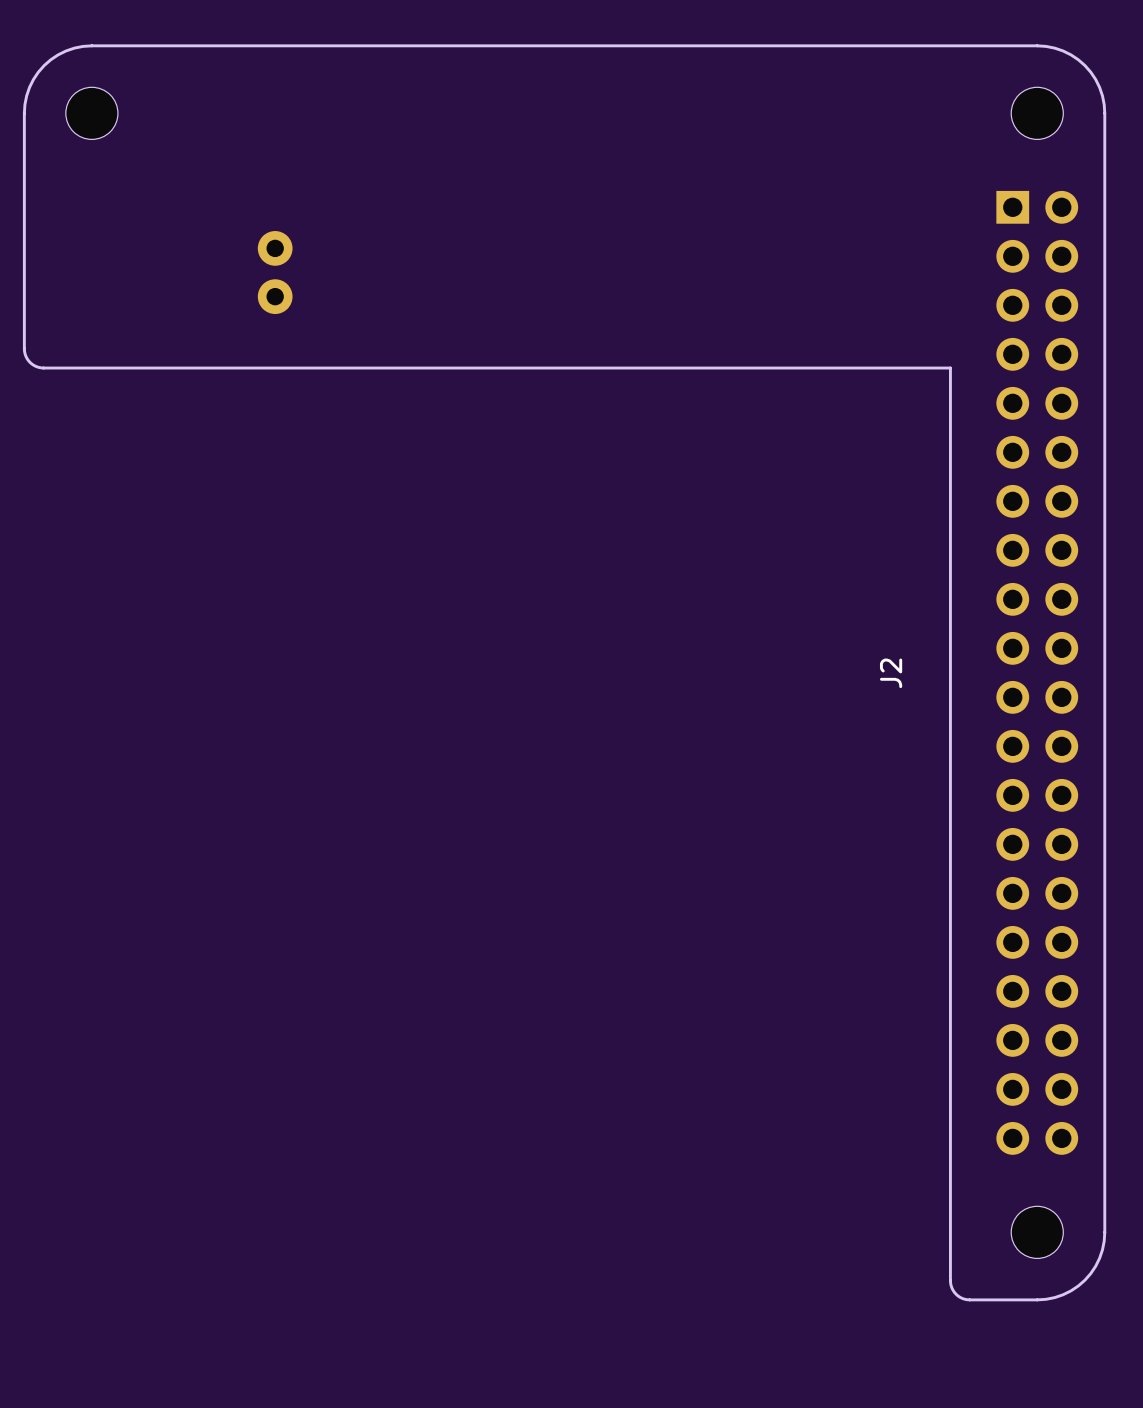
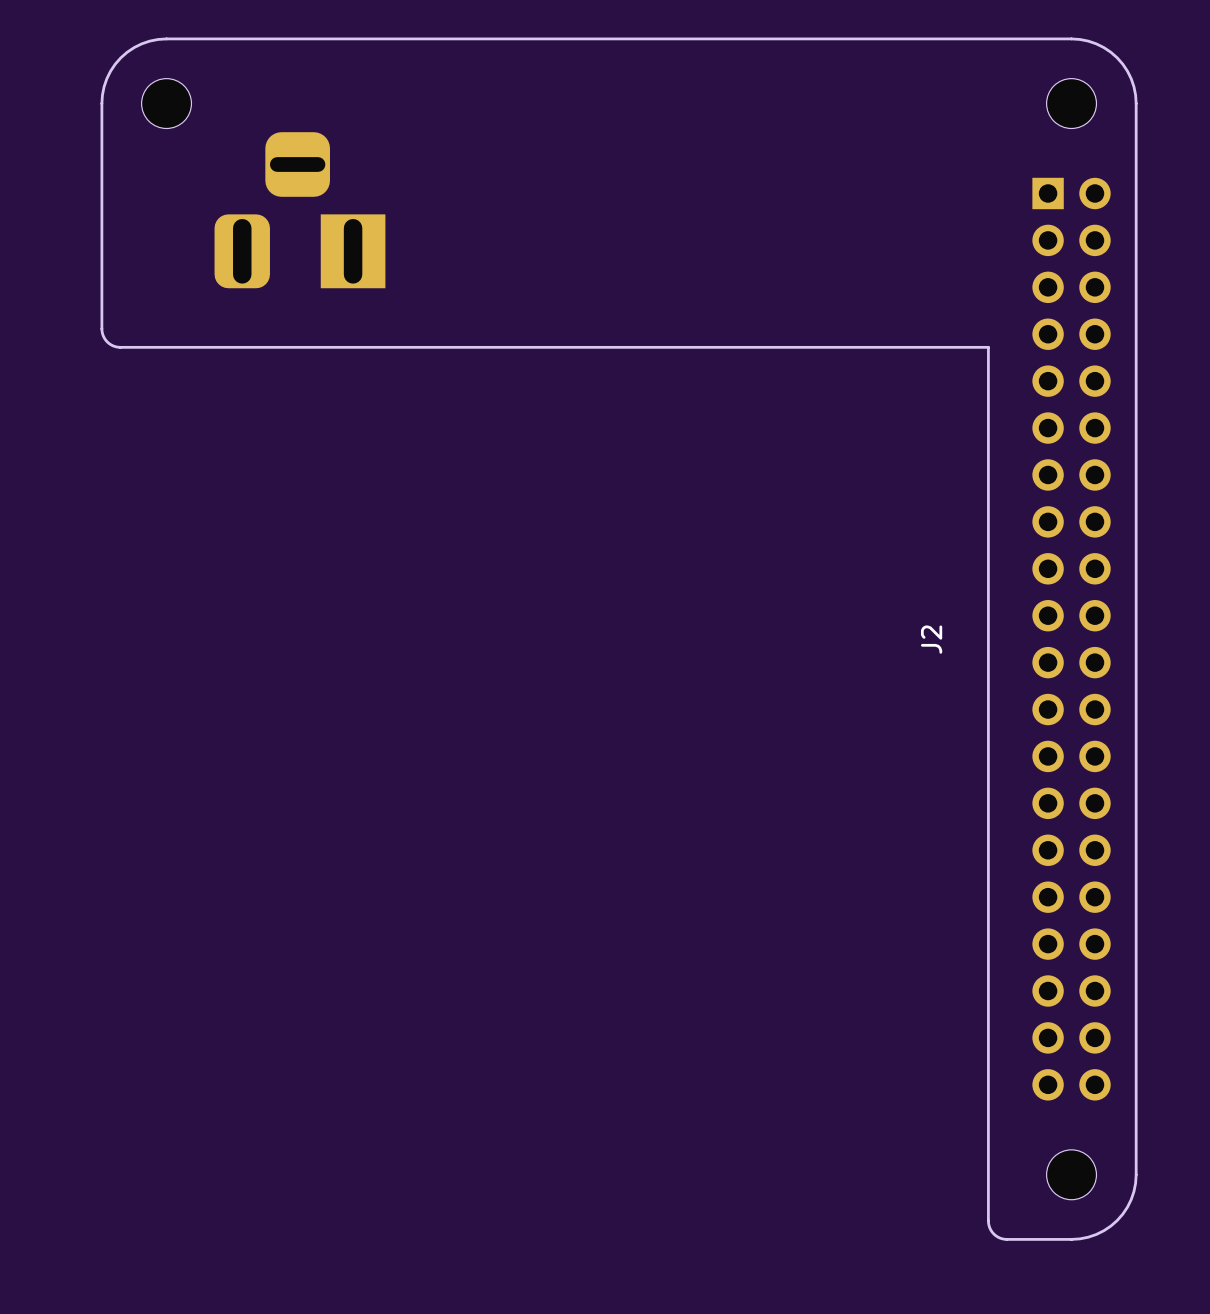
part: none -> (299, 210)
part: (275, 272) -> none

